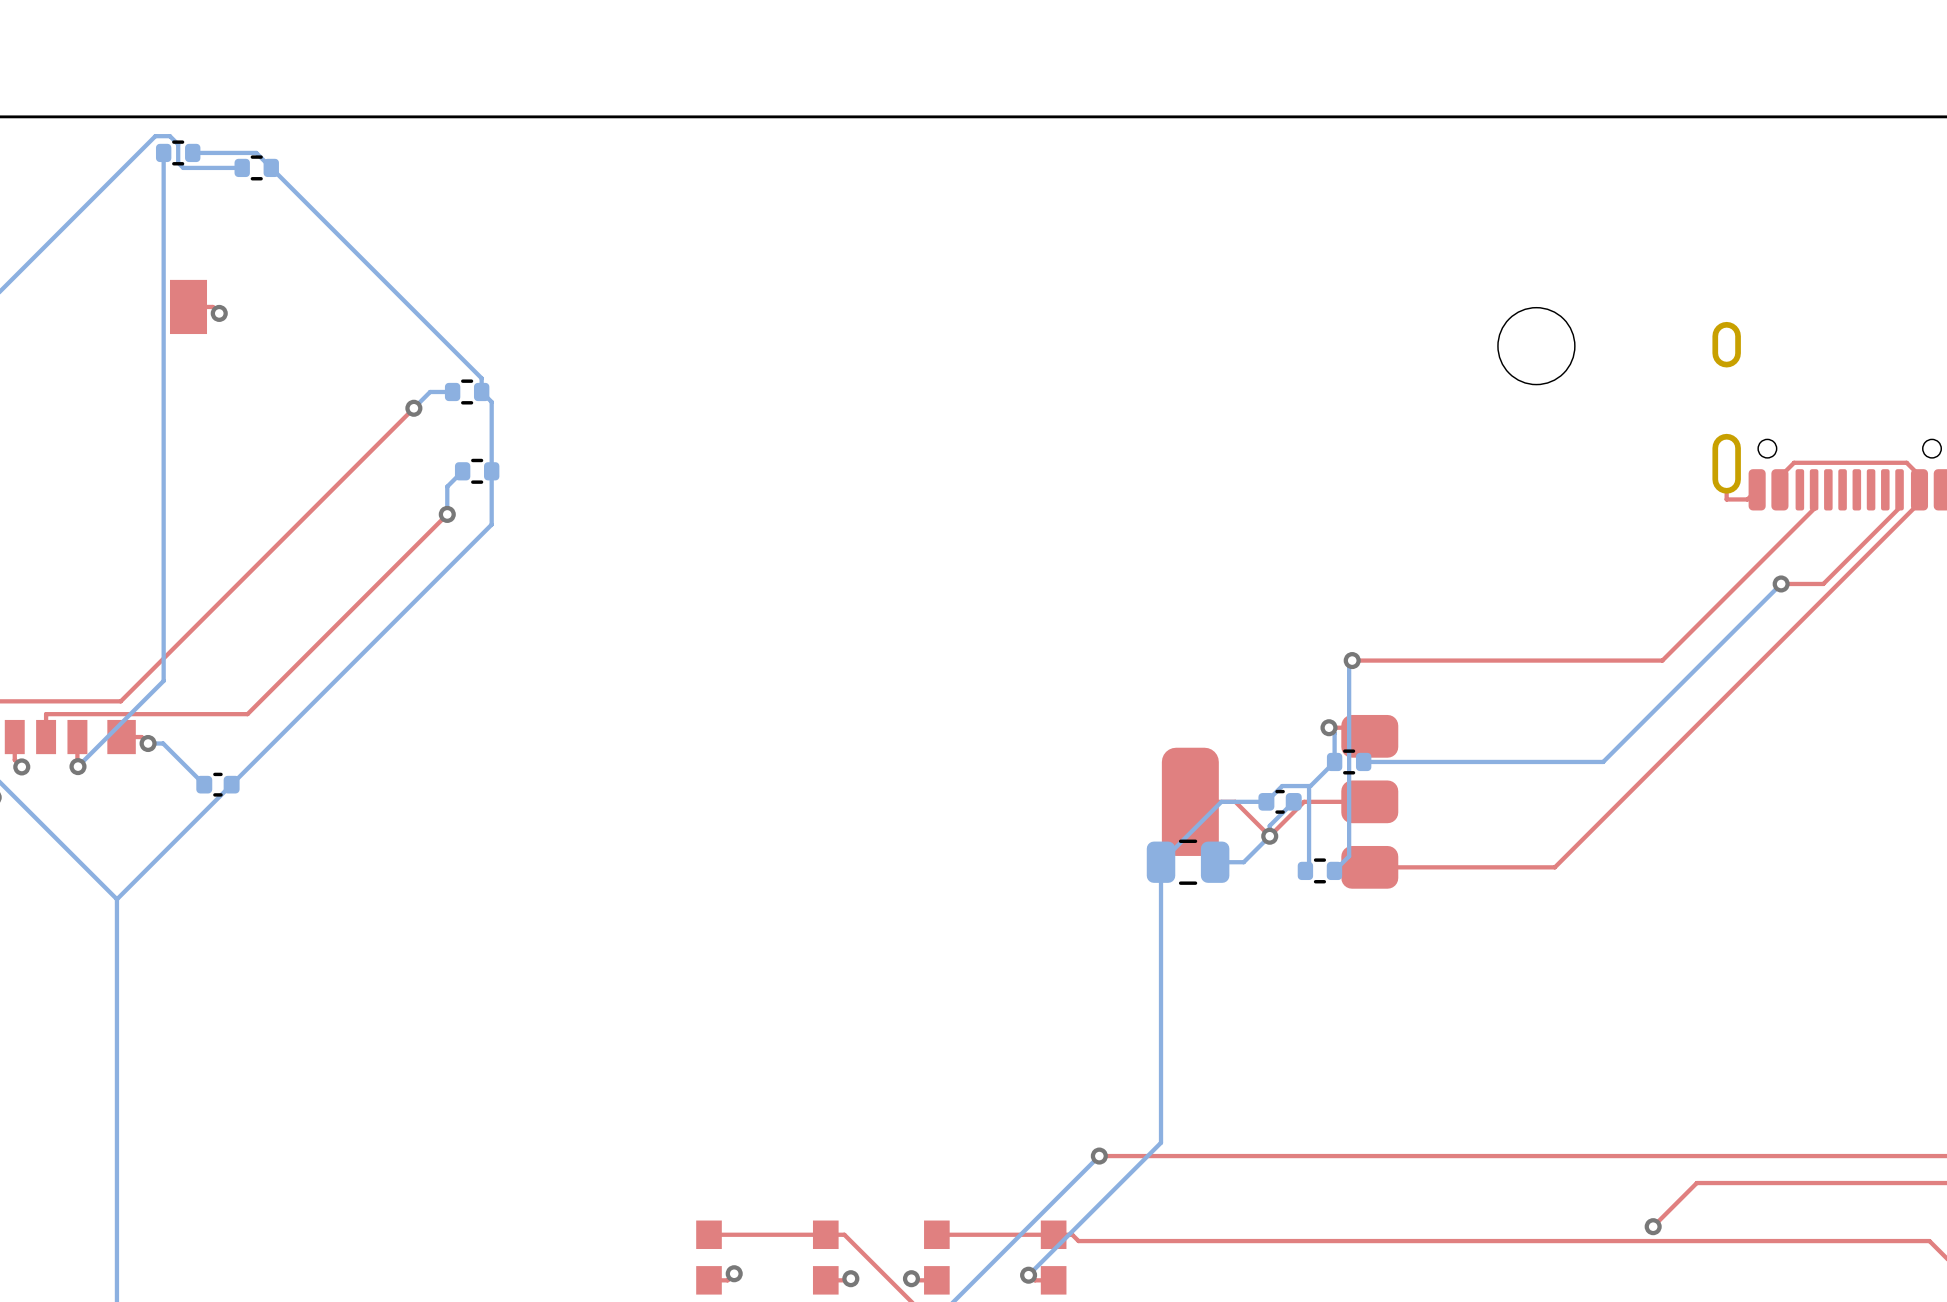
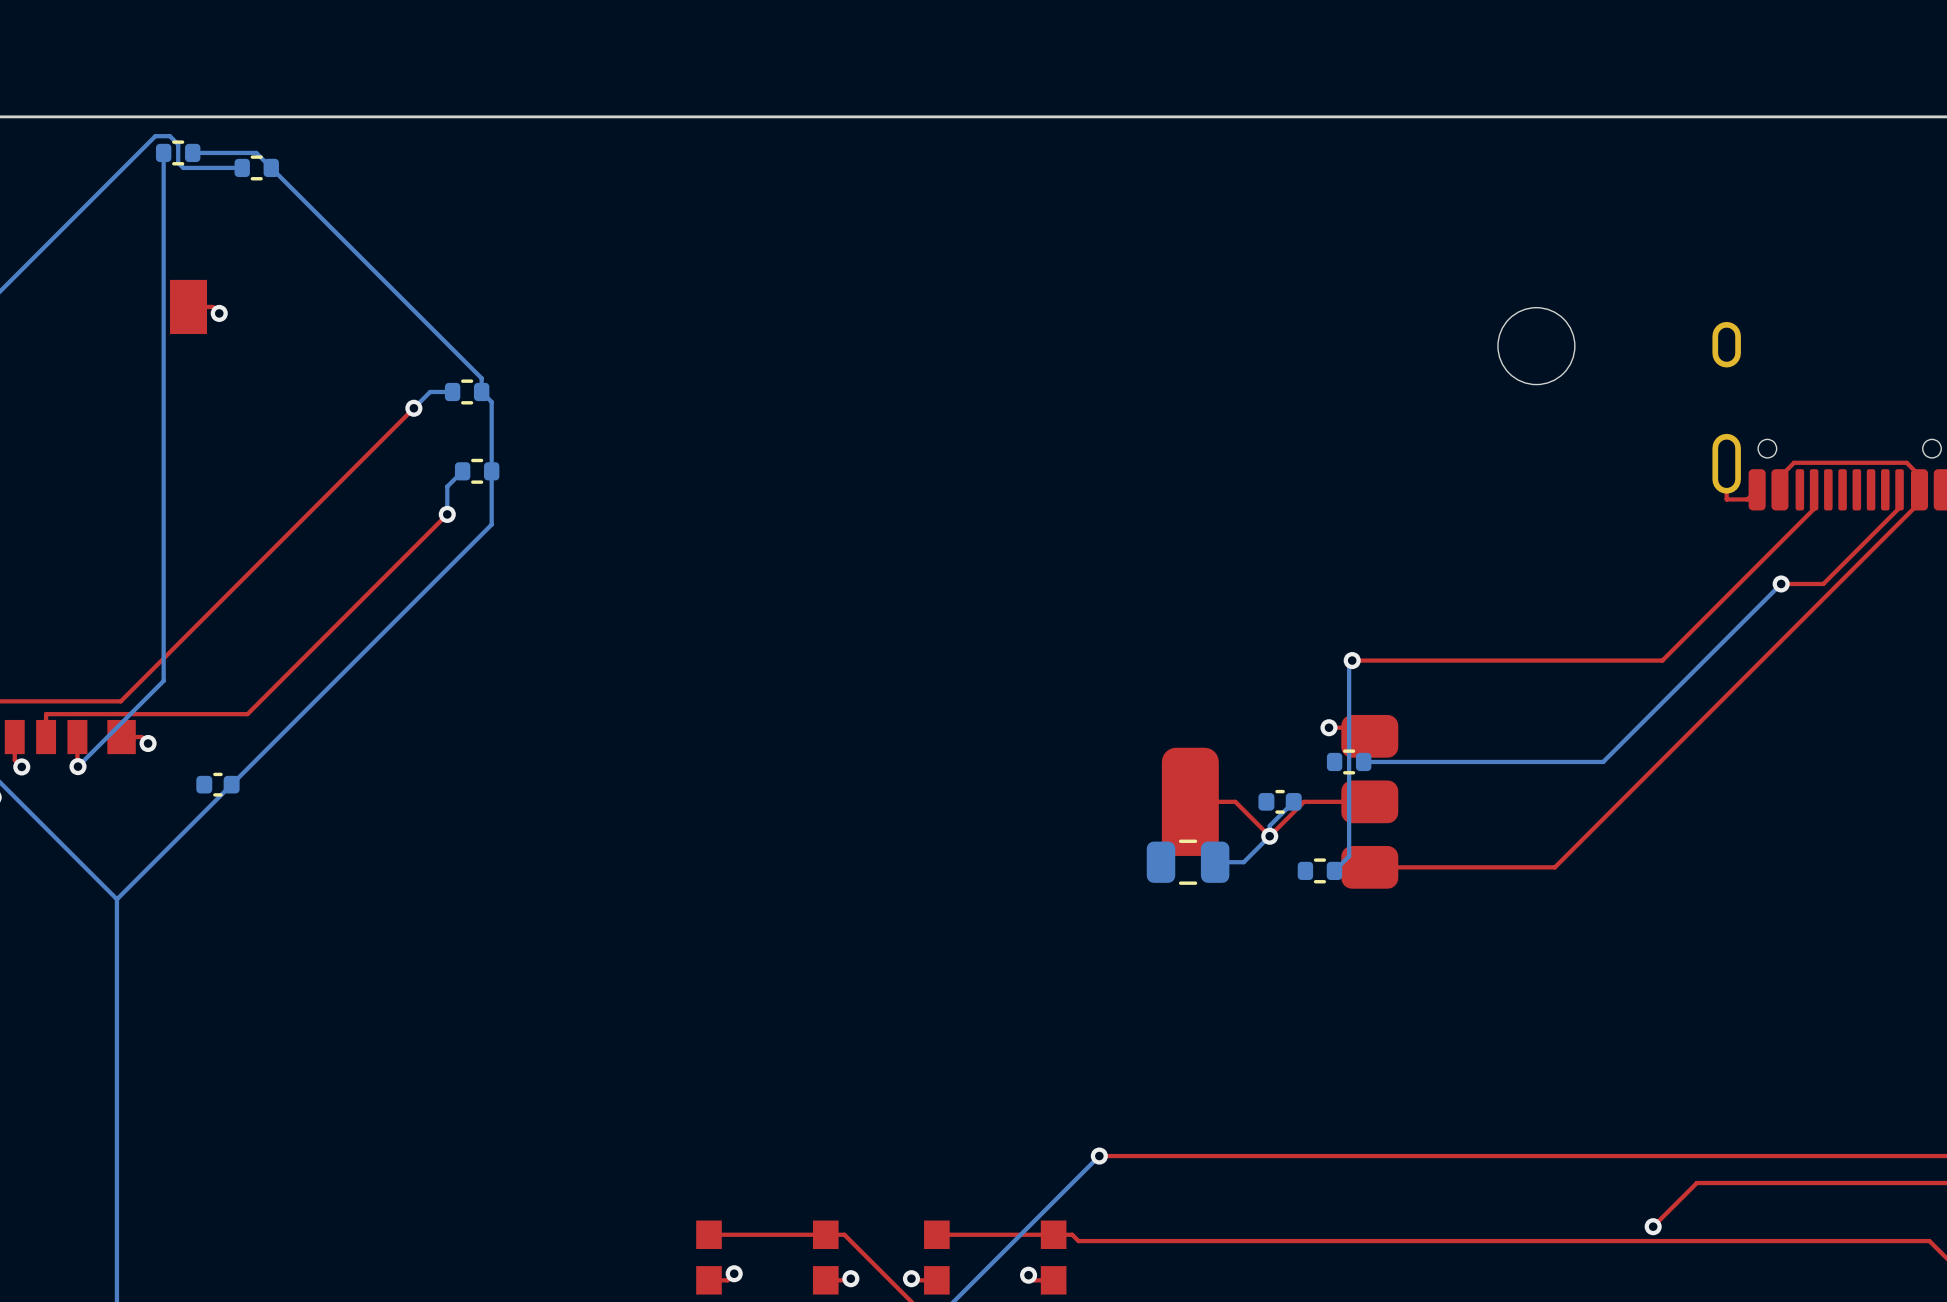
bottom track: (1329, 727) (1334, 733) (1334, 761) (1310, 786) (1282, 786) (1266, 801) (1221, 801) (1161, 862) (1161, 1142) (1028, 1275) -> none
bottom track: (148, 743) (163, 743) (204, 784) -> none
bottom track: (1309, 786) (1309, 867) (1305, 870) -> none

